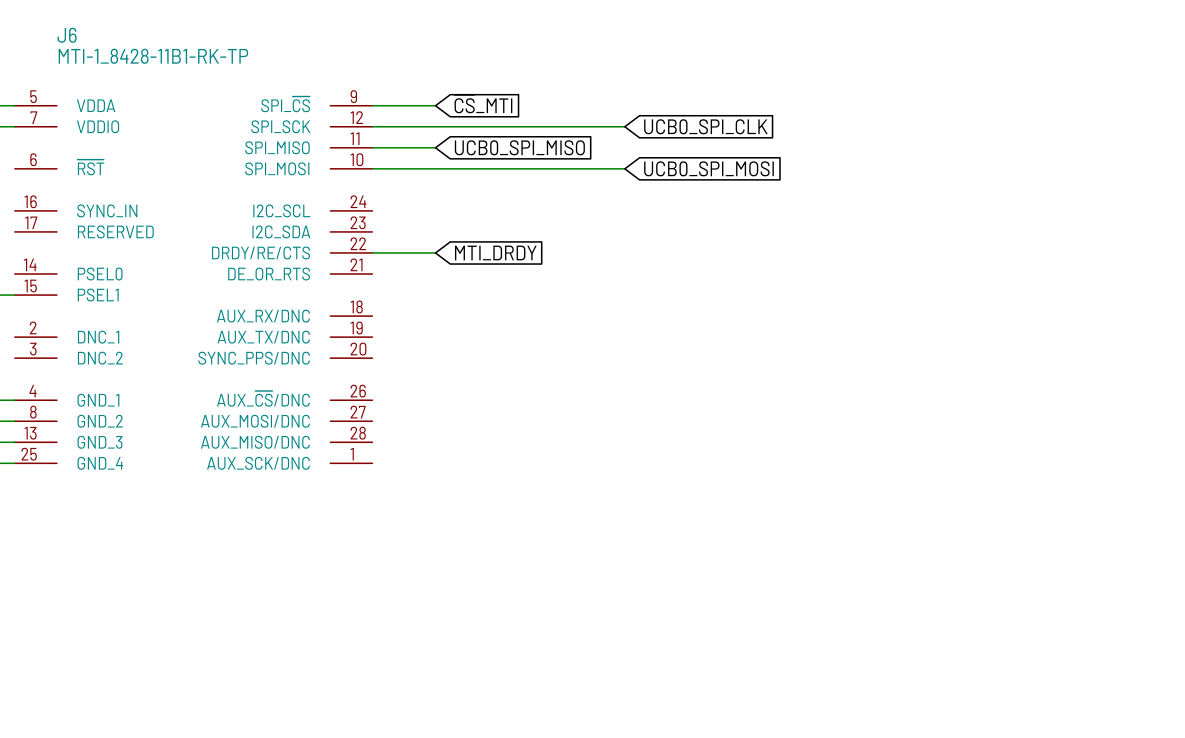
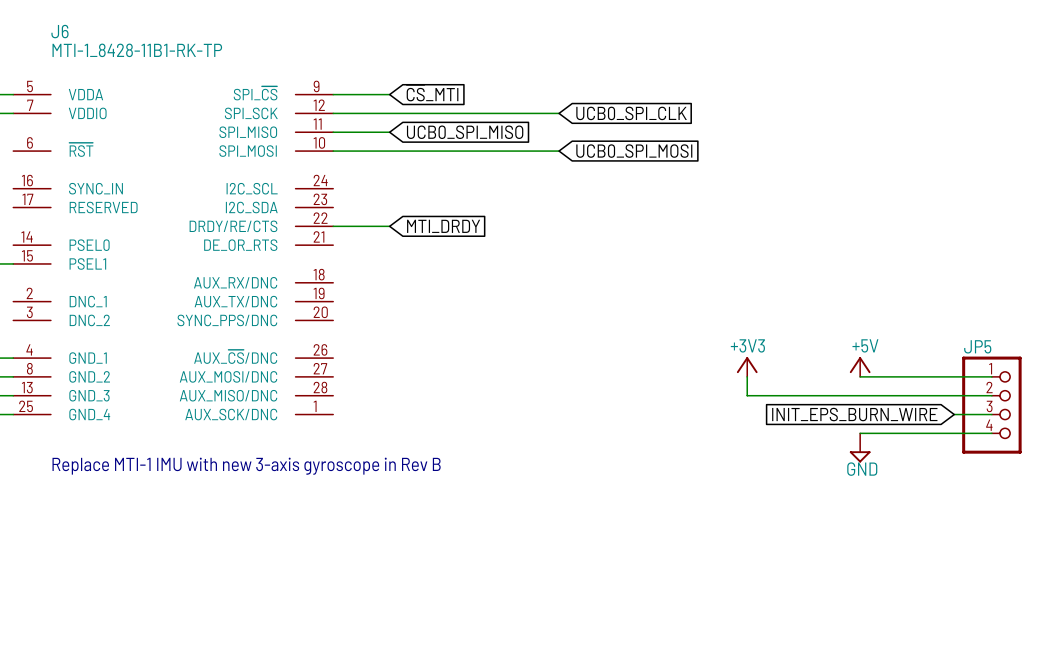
power symbol: none -> +3V3 (747, 367)
power symbol: none -> +5V (860, 367)
wire: none -> (747, 376) (747, 395) (991, 395)
wire: none -> (860, 376) (991, 376)
JP5: none -> (991, 405)
global label: none -> INIT_EPS_BURN_WIRE (854, 414)
wire: none -> (954, 414) (991, 414)
wire: none -> (860, 433) (991, 433)
power symbol: none -> GND (860, 447)
text: none -> Replace MTI-1 IMU with new 3-axis gyroscope in Rev B (246, 466)

